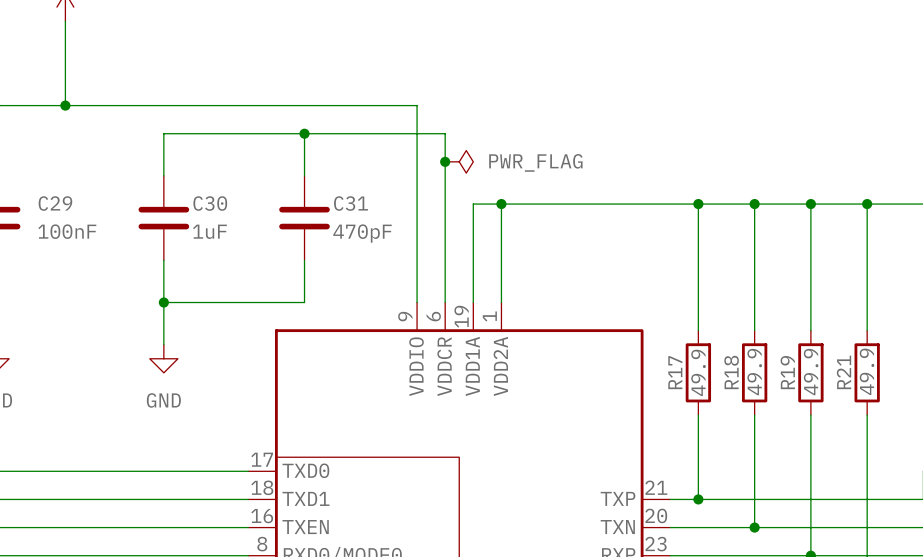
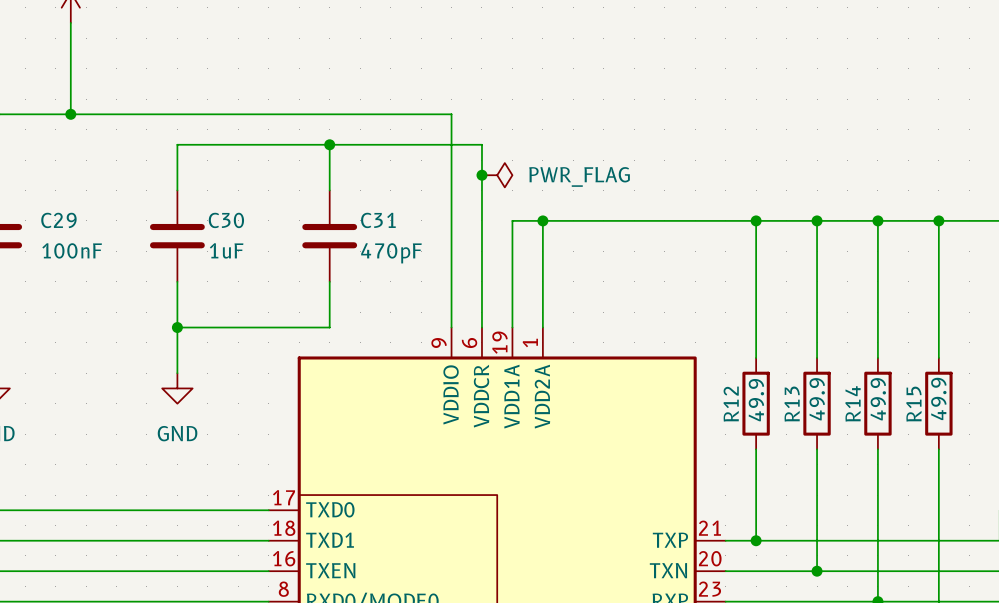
R17 name: R17 (675, 372) -> R12 (731, 404)
R18 name: R18 (731, 372) -> R13 (792, 404)
R19 name: R19 (787, 372) -> R14 (853, 403)
R21 name: R21 (844, 372) -> R15 (913, 404)

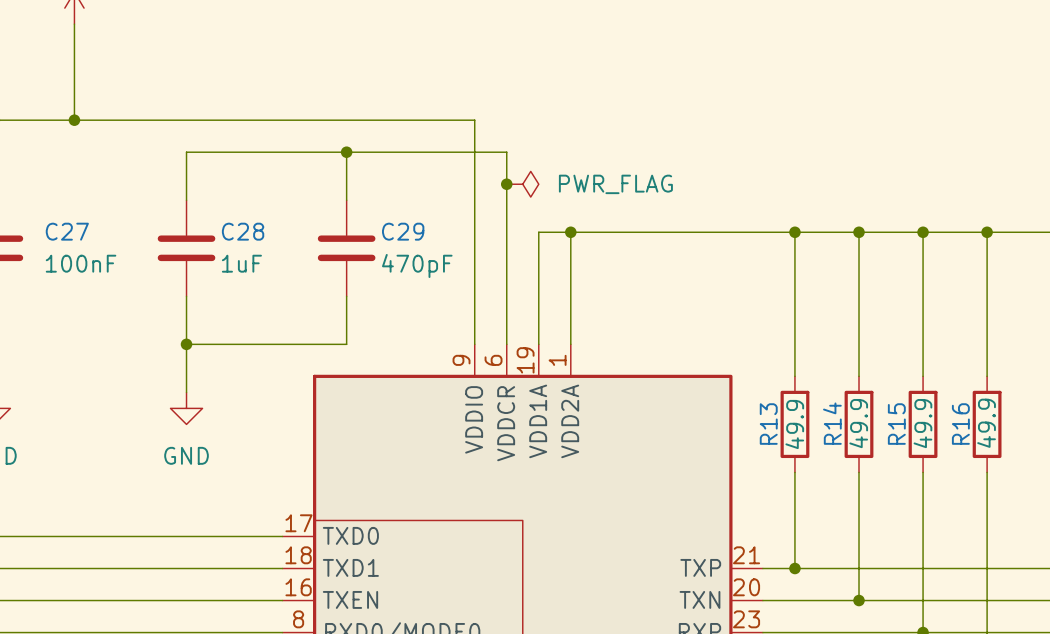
C29 name: C29 (58, 220) -> C27 (67, 231)
C30 name: C30 (226, 220) -> C28 (243, 231)
C31 name: C31 (378, 220) -> C29 (403, 231)
R14 name: R14 (853, 403) -> R15 (896, 424)
R12 name: R12 (731, 404) -> R13 (768, 424)
R13 name: R13 (792, 404) -> R14 (832, 423)
R15 name: R15 (913, 404) -> R16 (960, 424)

